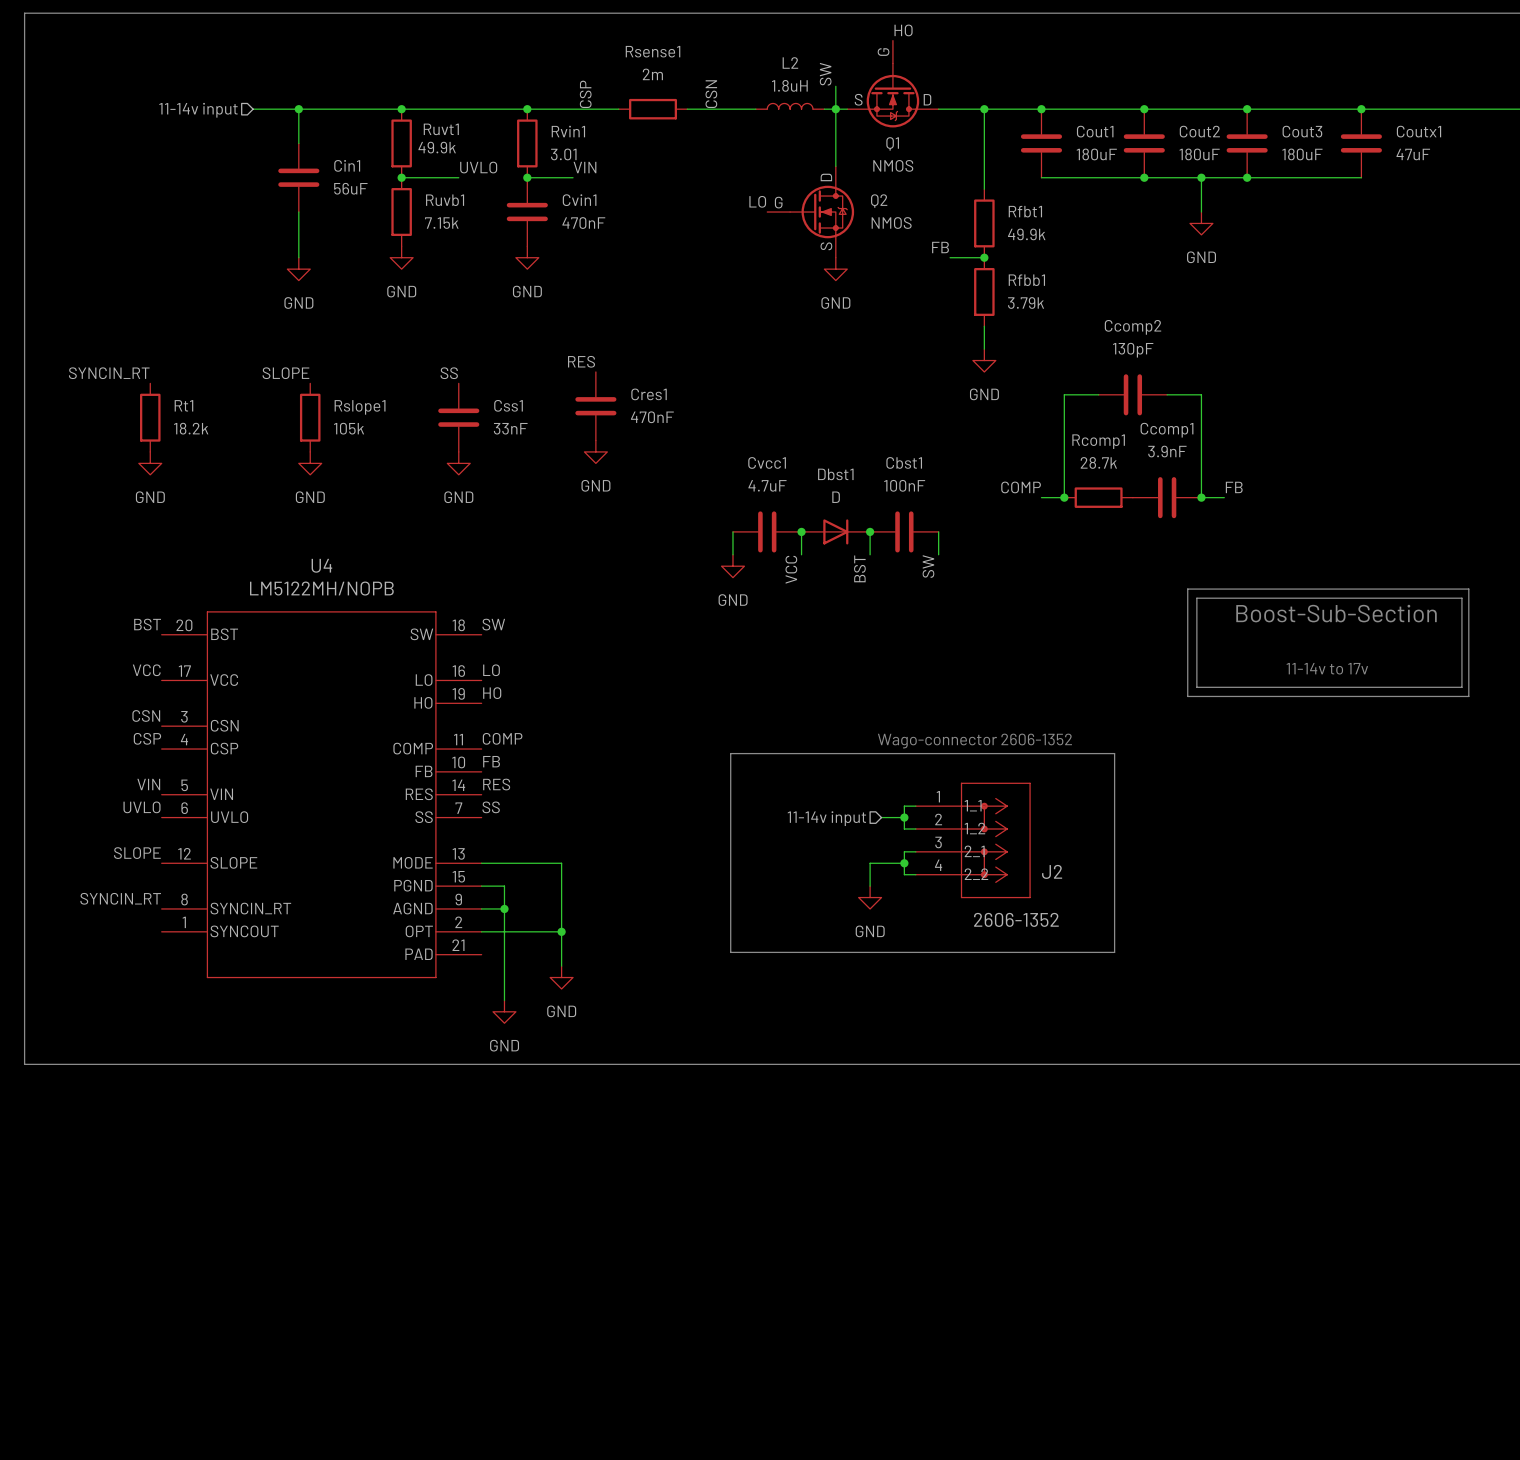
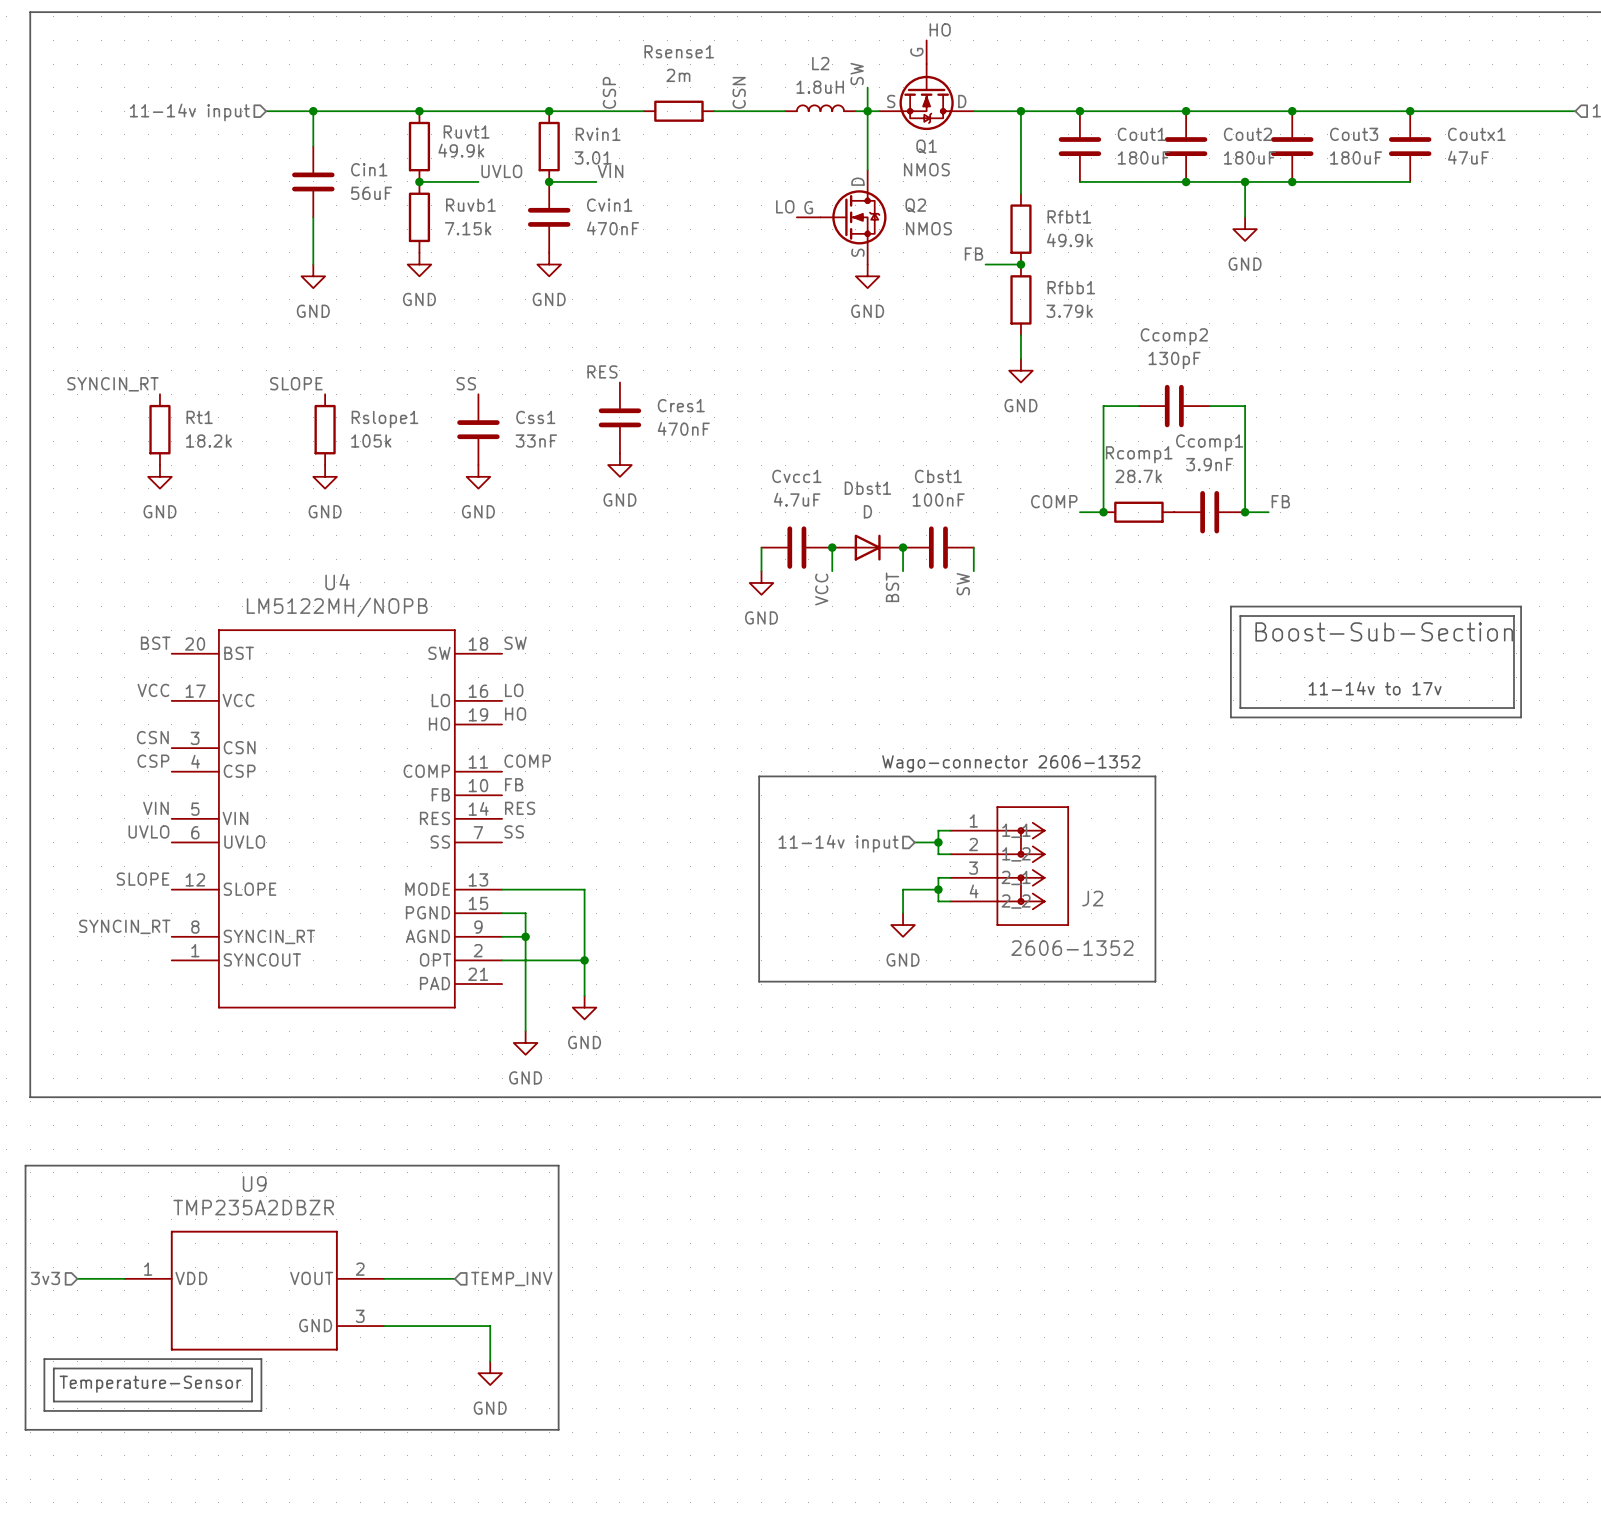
line: none -> (25, 1165) (558, 1165) (558, 1429) (25, 1429) (25, 1165)
hierarchical label: none -> 3v3 (45, 1278)
hierarchical label: none -> TEMP_INV (511, 1278)
wire: none -> (77, 1278) (124, 1278)
wire: none -> (384, 1278) (454, 1278)
U9: none -> TMP235A2DBZR (254, 1290)
wire: none -> (384, 1326) (490, 1326) (490, 1361)
line: none -> (44, 1359) (261, 1359) (261, 1410) (44, 1410) (44, 1359)
line: none -> (53, 1368) (251, 1368) (251, 1401) (53, 1401) (53, 1368)
power symbol: none -> GND (490, 1373)
text: none -> Temperature-Sensor (150, 1384)

